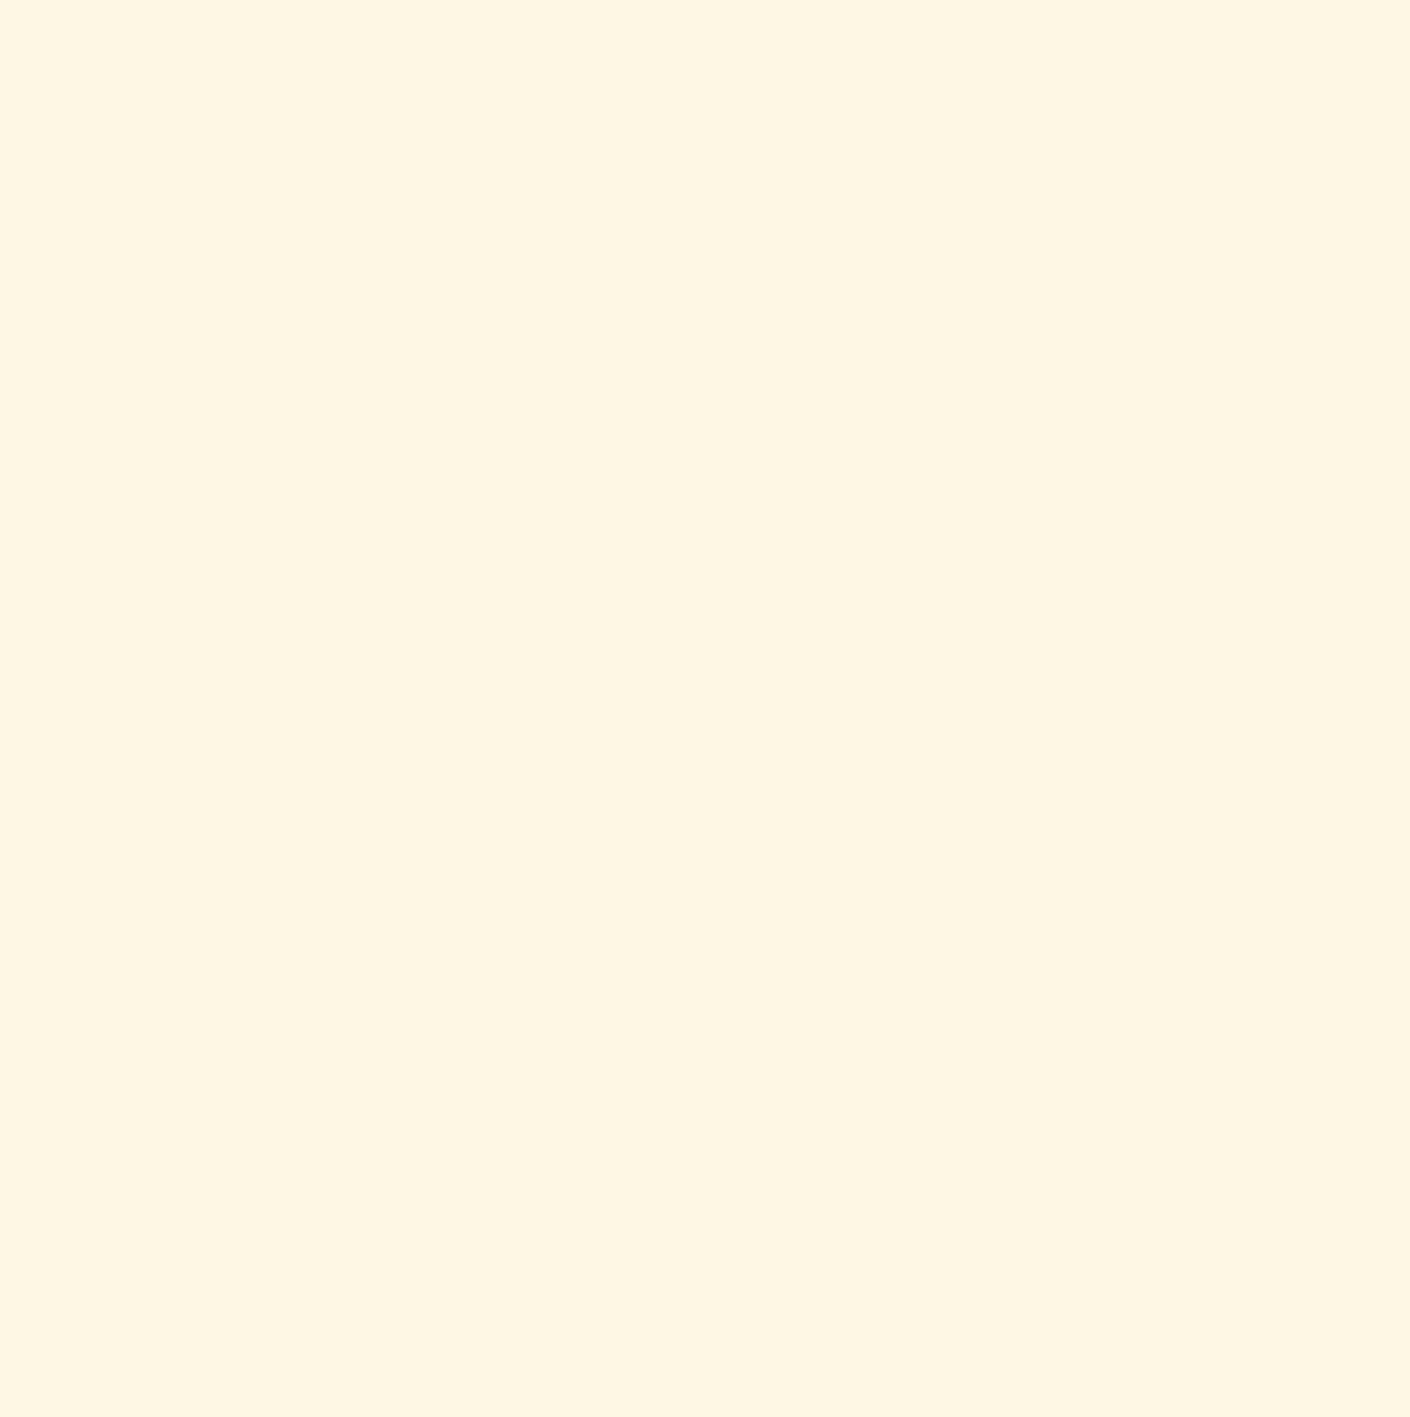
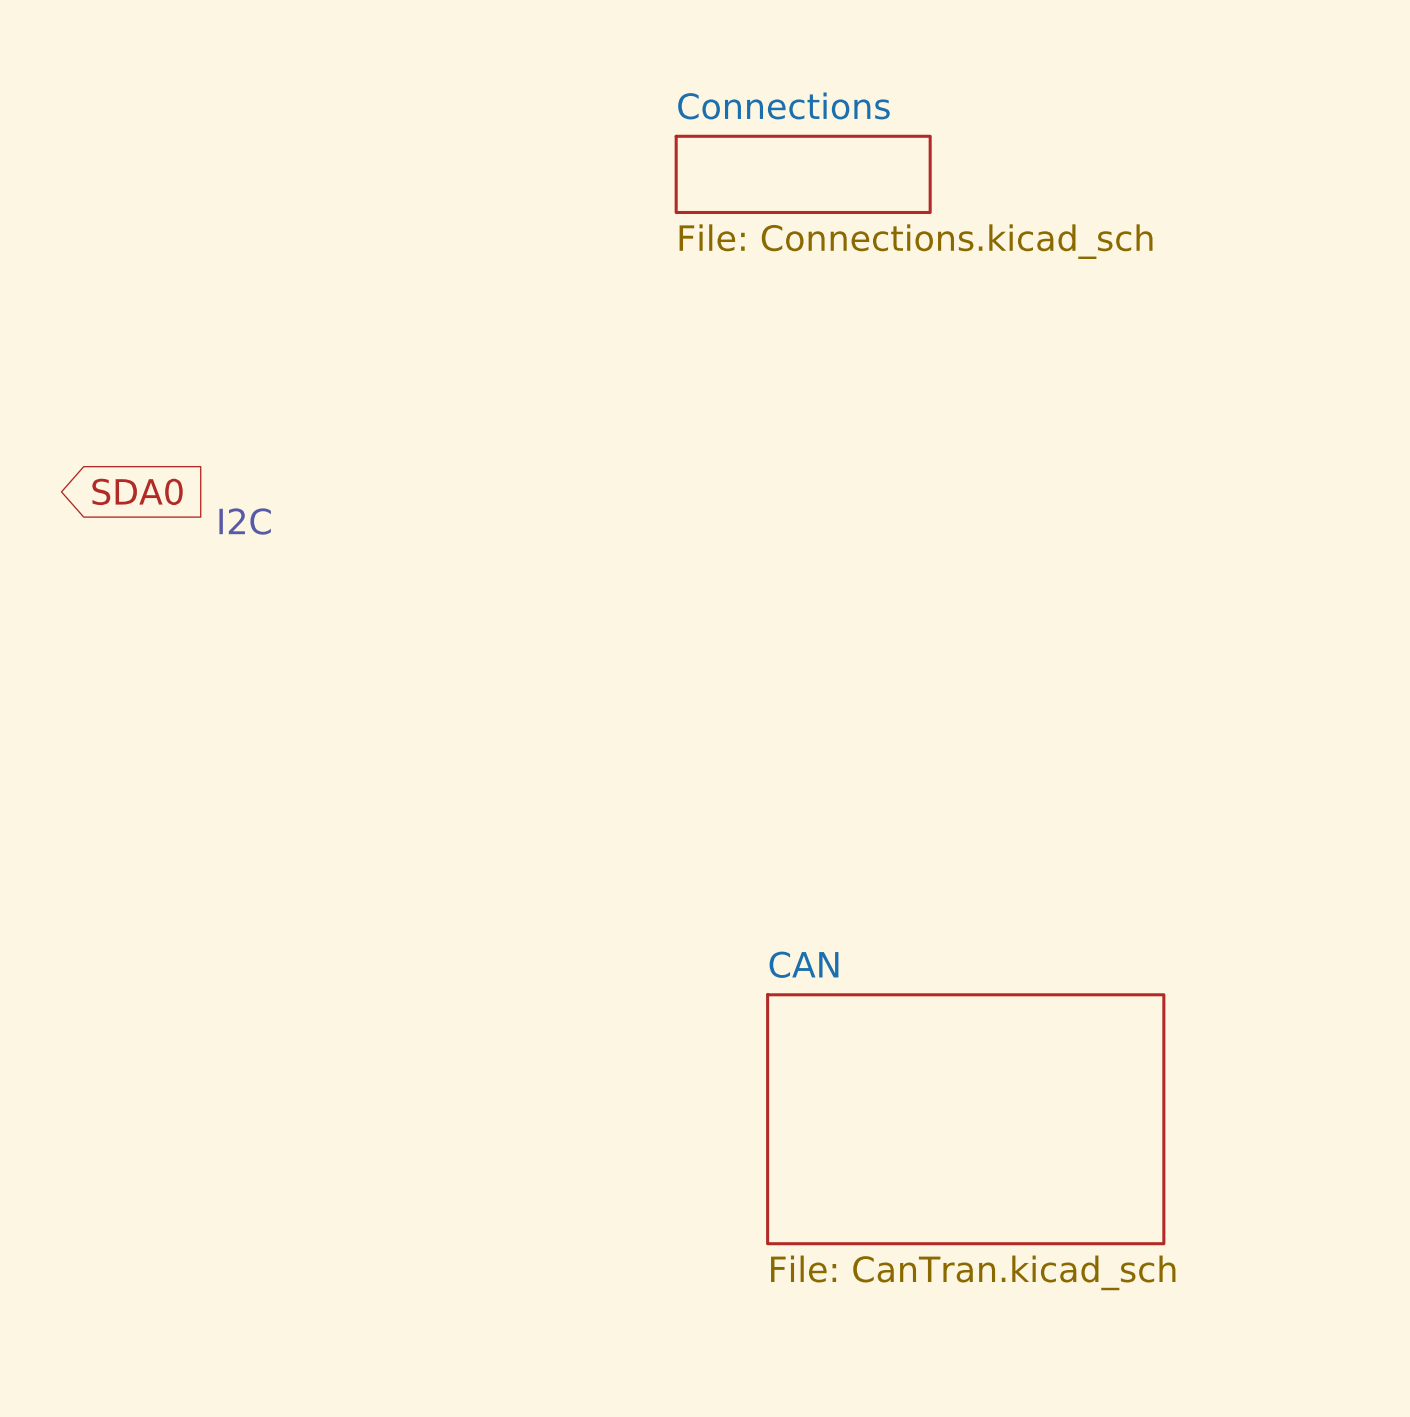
sheet Connections: none -> File: Connections.kicad_sch (803, 174)
global label: none -> SDA0 (137, 491)
text: none -> I2C (245, 521)
sheet CAN: none -> File: CanTran.kicad_sch (965, 1119)

